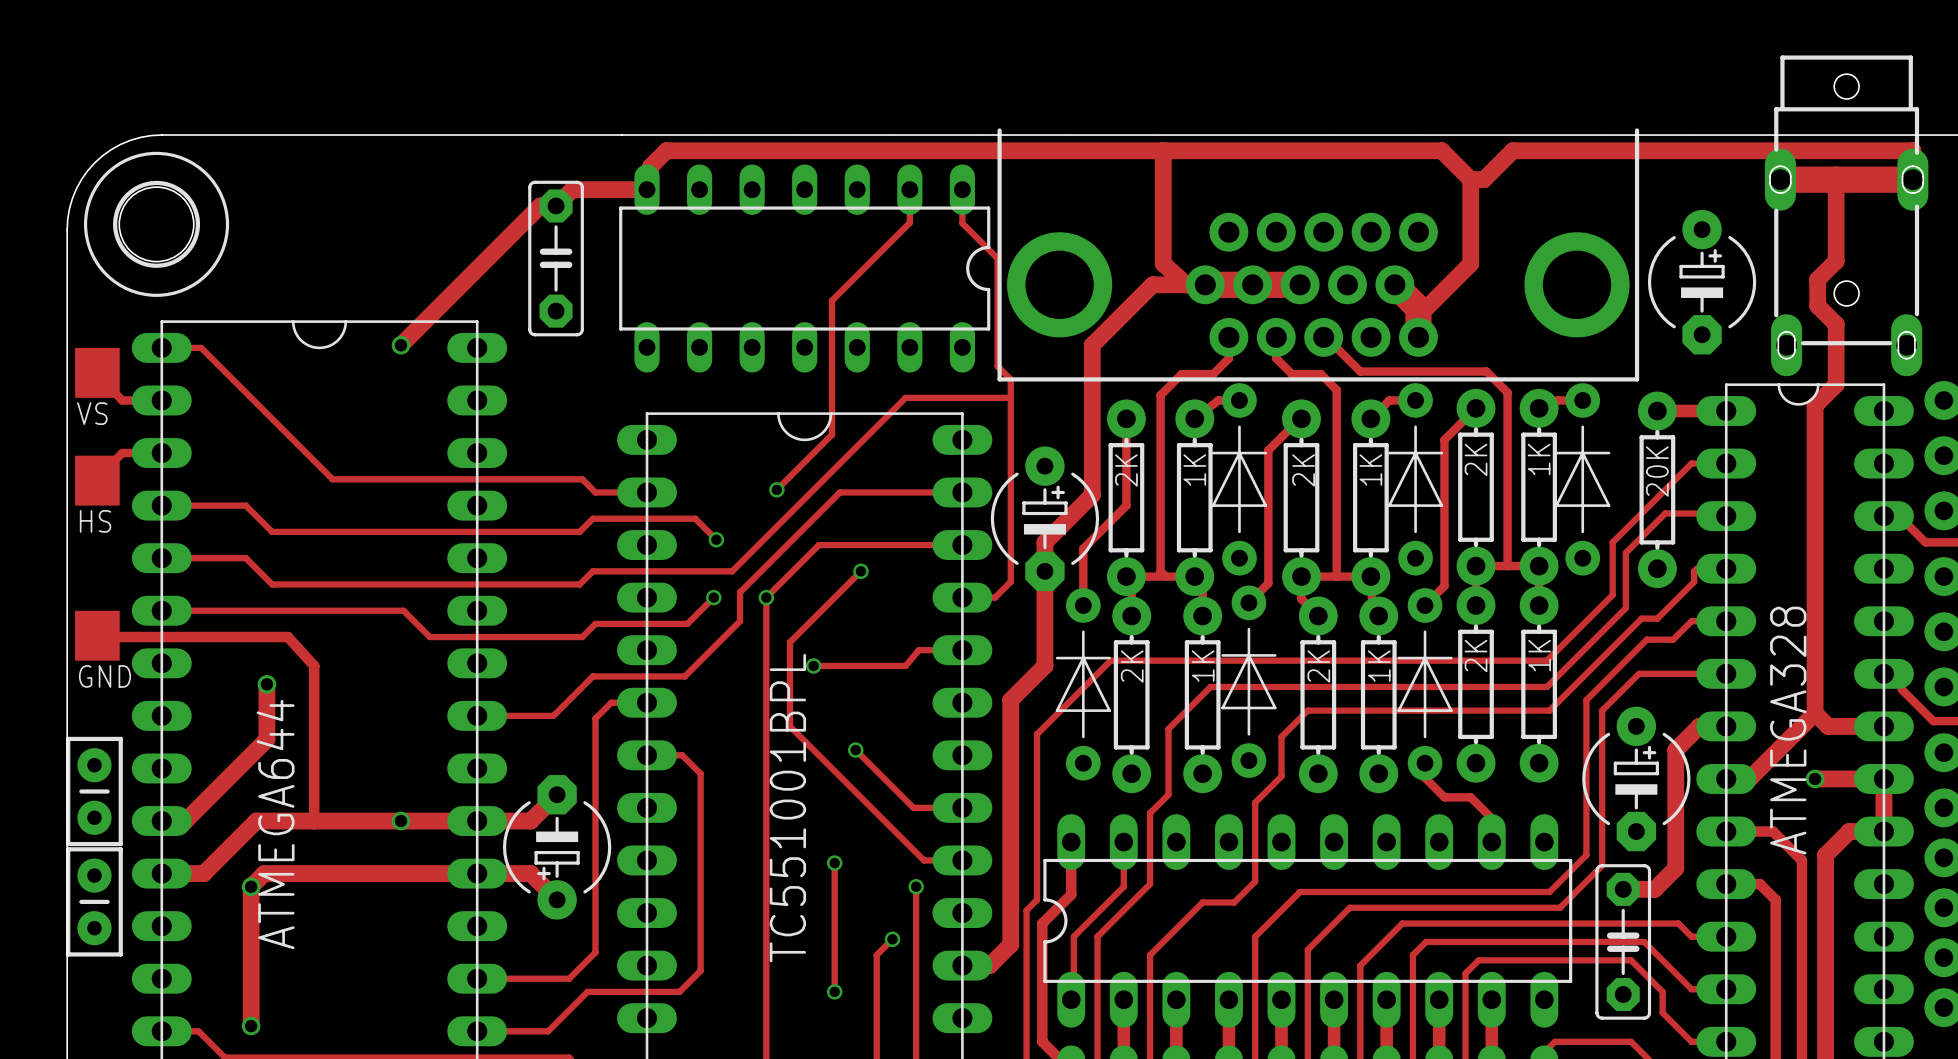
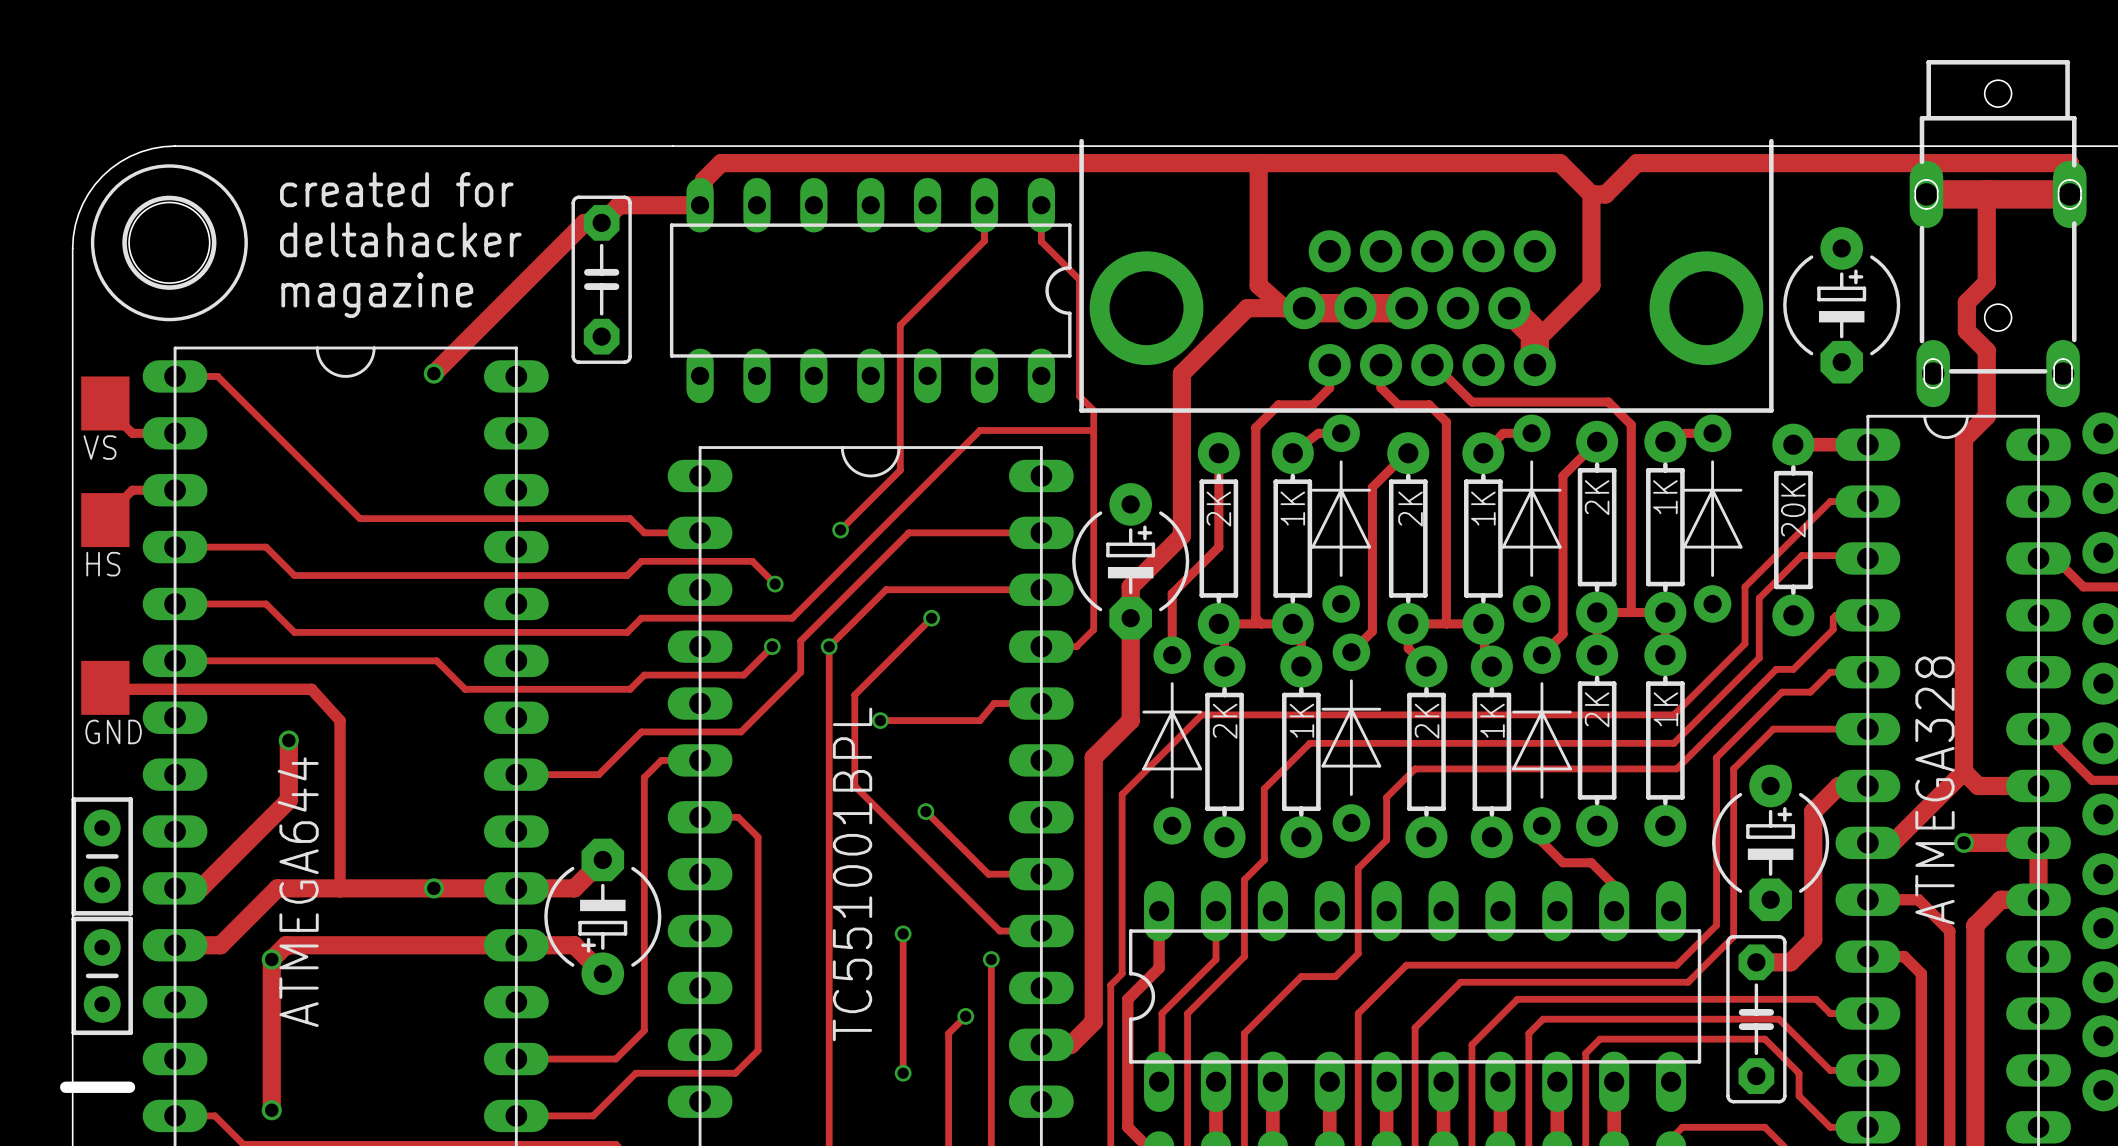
text: none -> created for (396, 189)
text: none -> deltahacker (400, 239)
text: none -> magazine (377, 295)
board edge: none -> (65, 1087) (129, 1087)

